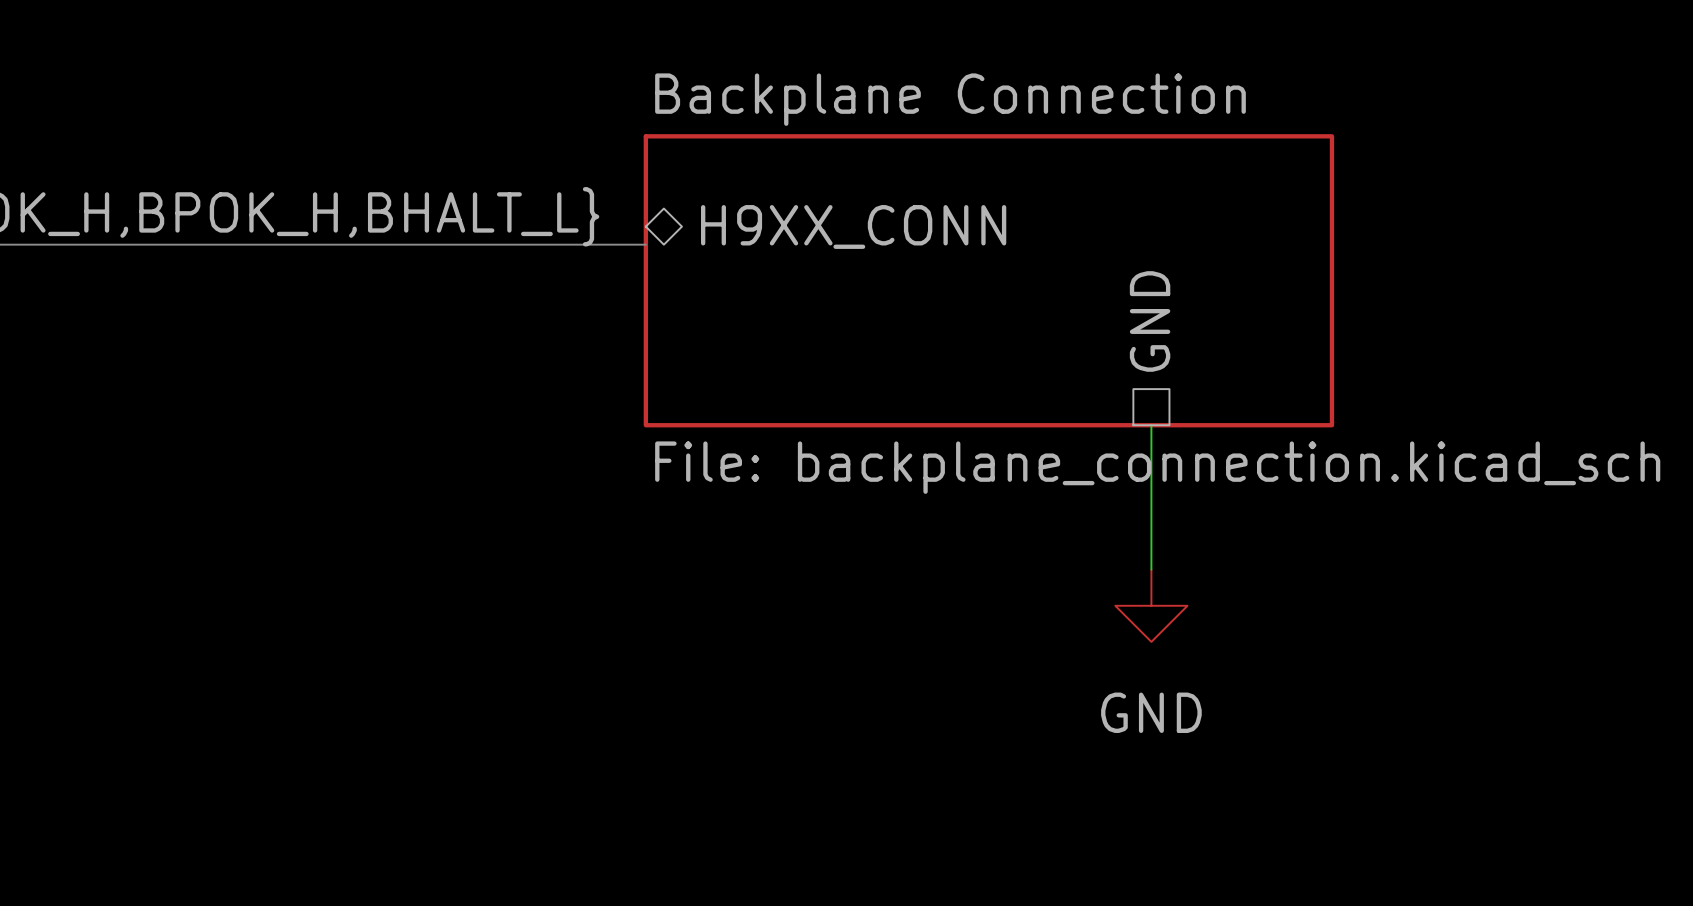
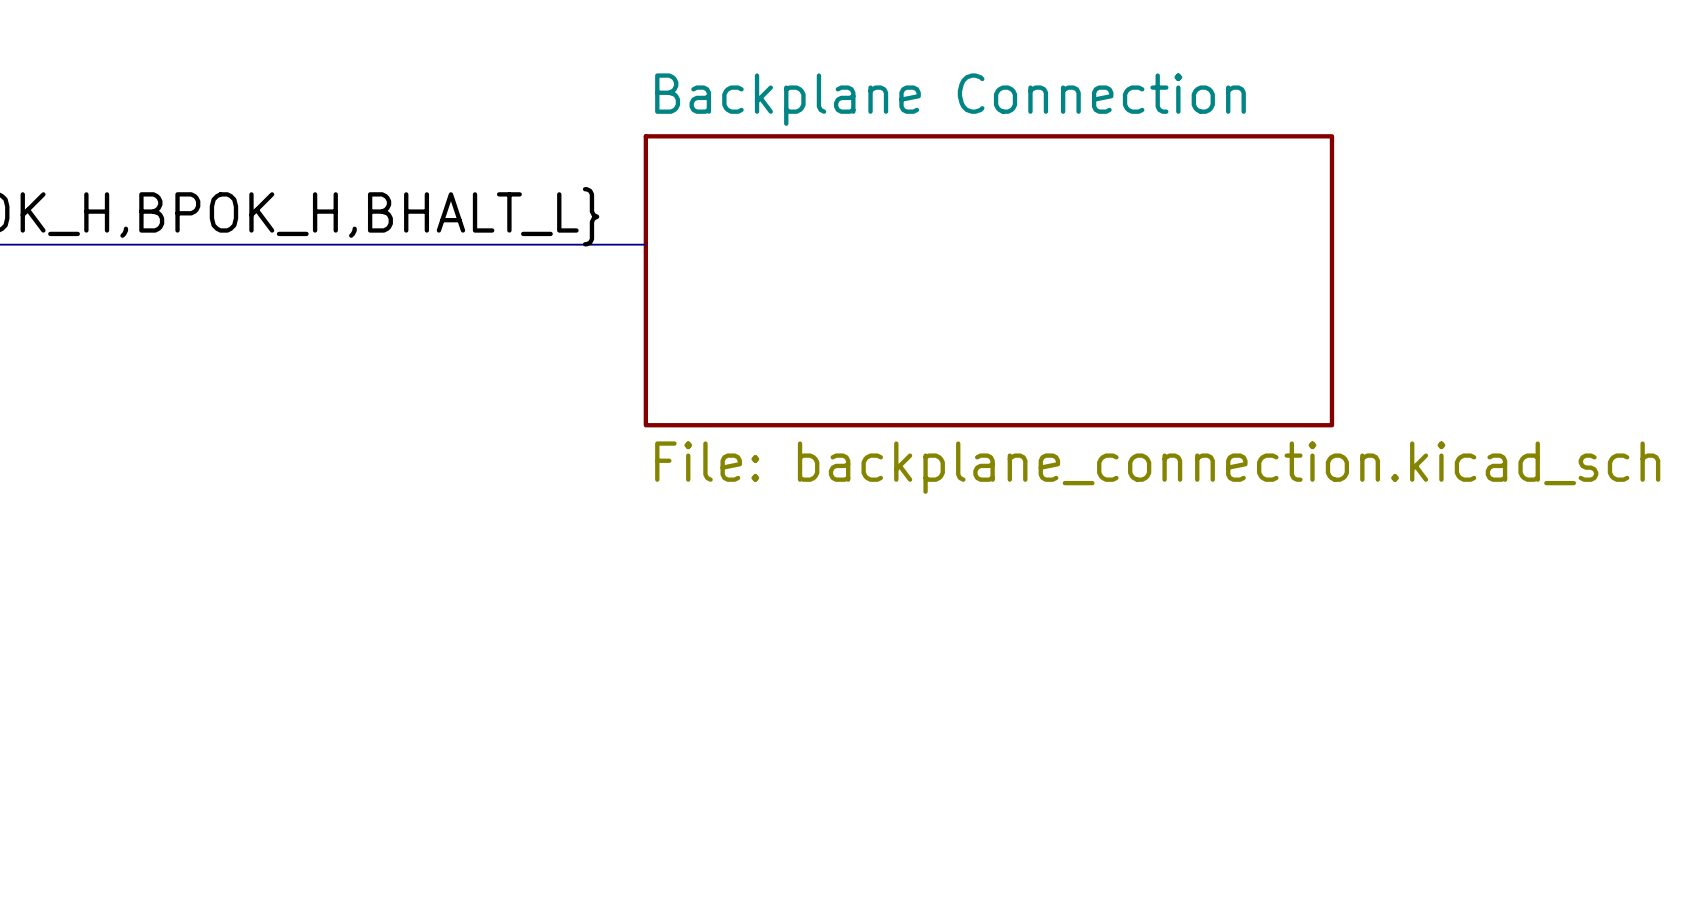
sheet pin: H9XX_CONN (853, 226) -> none
sheet pin: GND (1150, 321) -> none
wire: (1151, 425) (1151, 569) -> none
power symbol: GND (1151, 605) -> none

